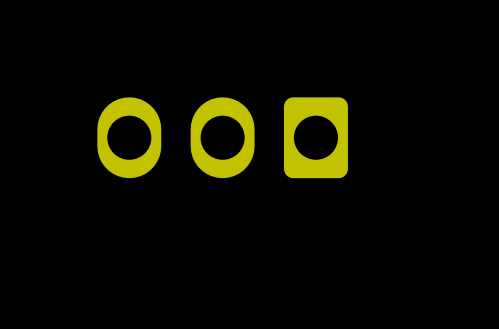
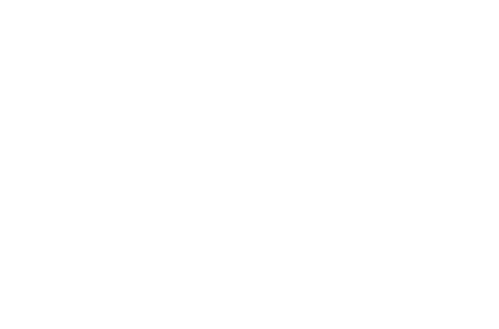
part: (222, 137) -> none

